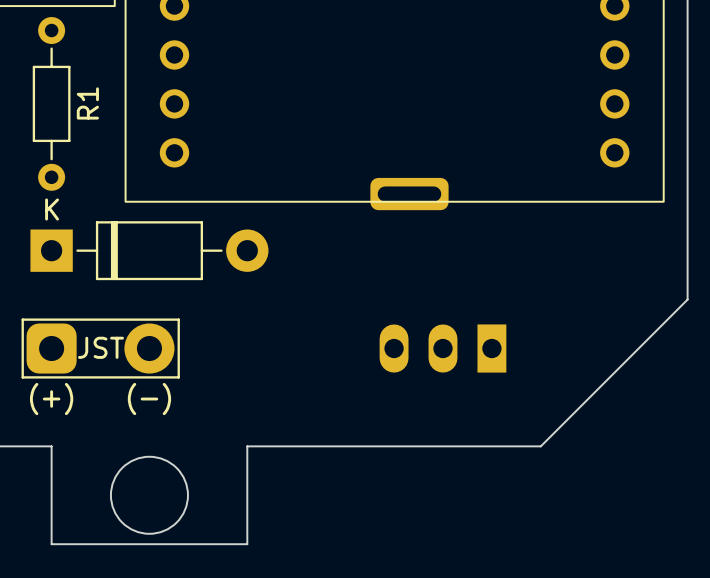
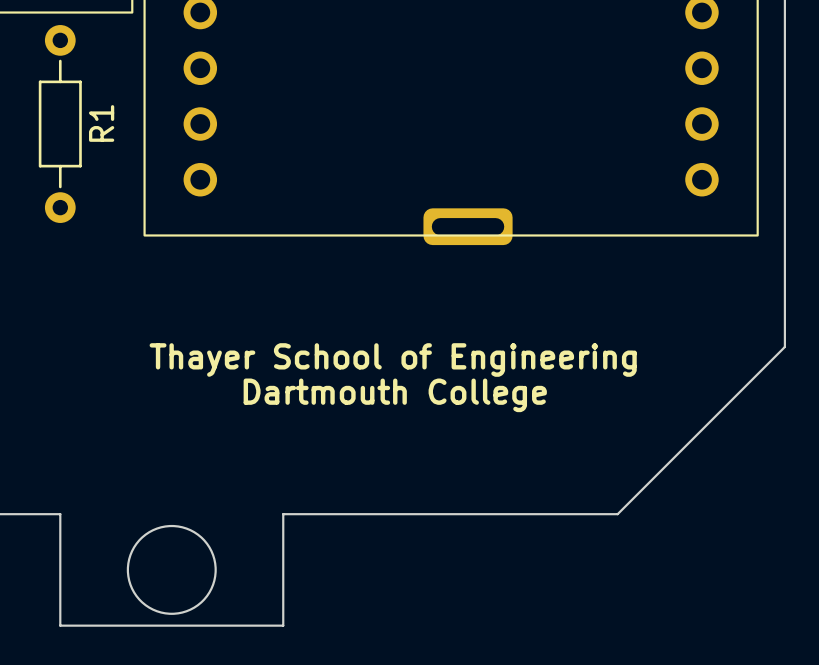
part: (149, 250) -> none
text: none -> Thayer School of Engineering (393, 360)
text: none -> Dartmouth College (395, 395)
text: JST (100, 347) -> none
part: (100, 348) -> none
part: (442, 348) -> none
text: (+) (51, 399) -> none
text: (-) (149, 399) -> none

